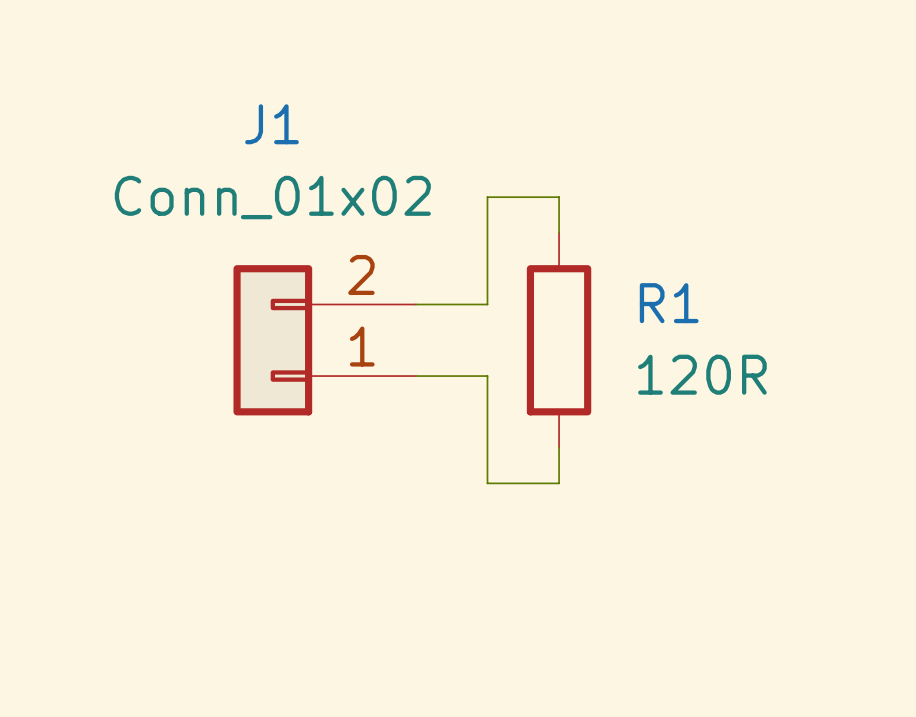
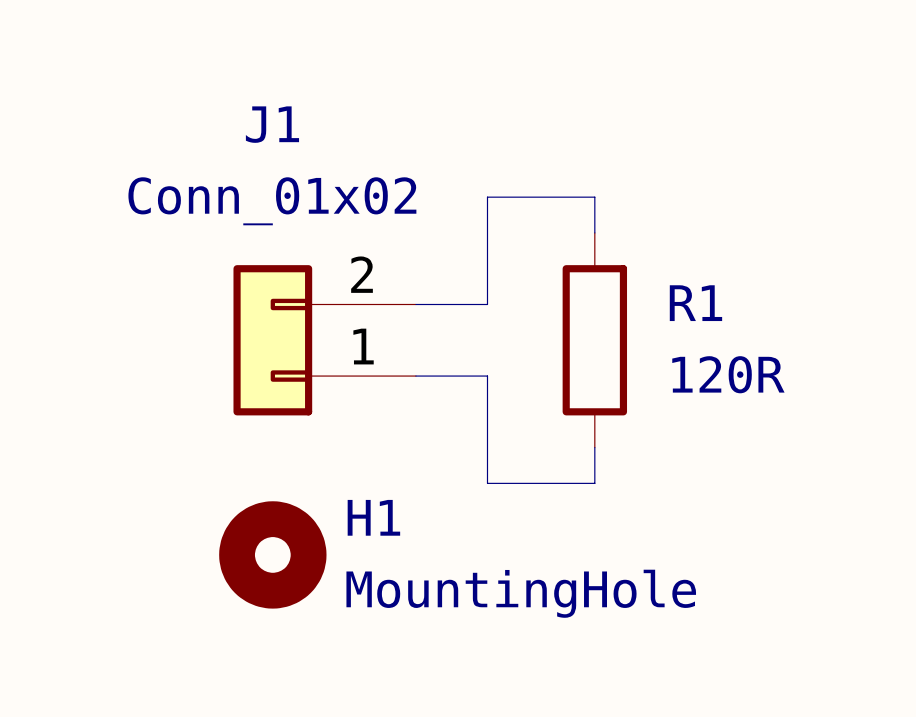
wire: (559, 197) (559, 232) -> (559, 197) (594, 197) (594, 232)
R1 position: (559, 340) -> (594, 340)
wire: (559, 447) (559, 483) -> (594, 447) (594, 483) (559, 483)
H1: none -> MountingHole (272, 554)

